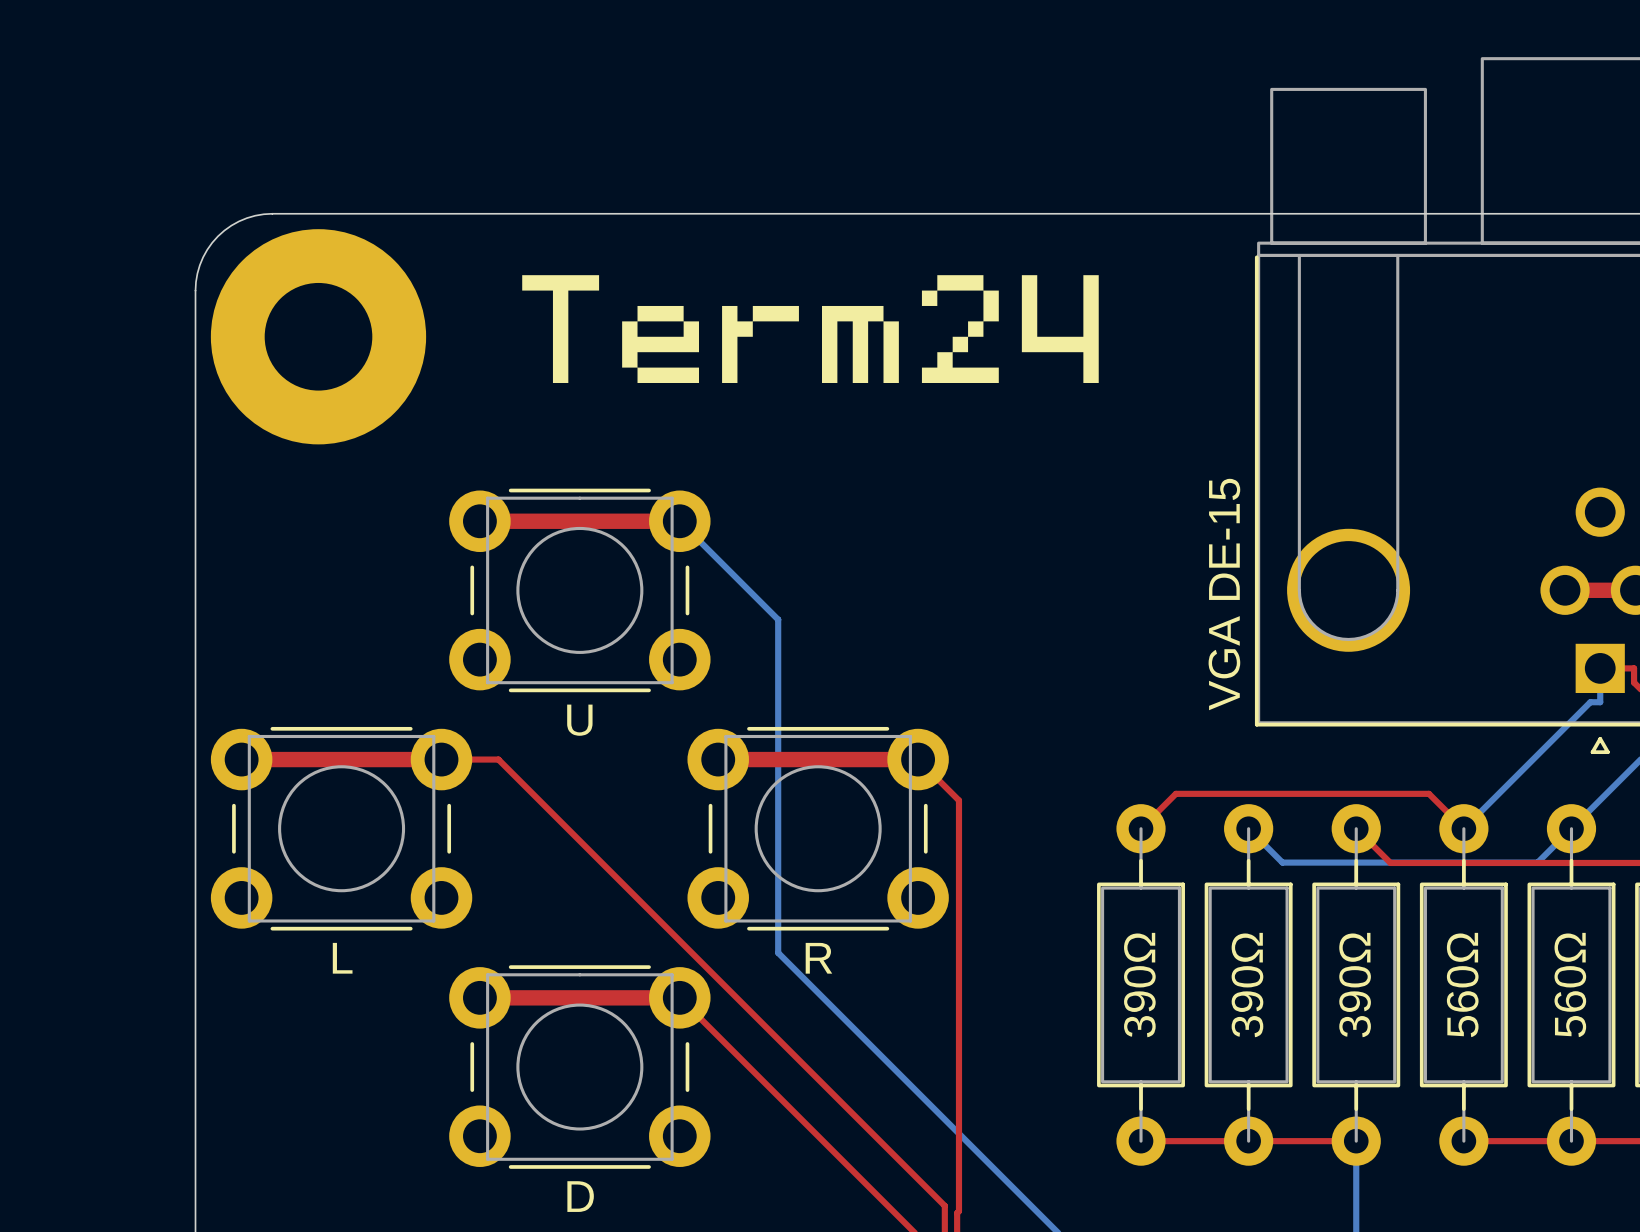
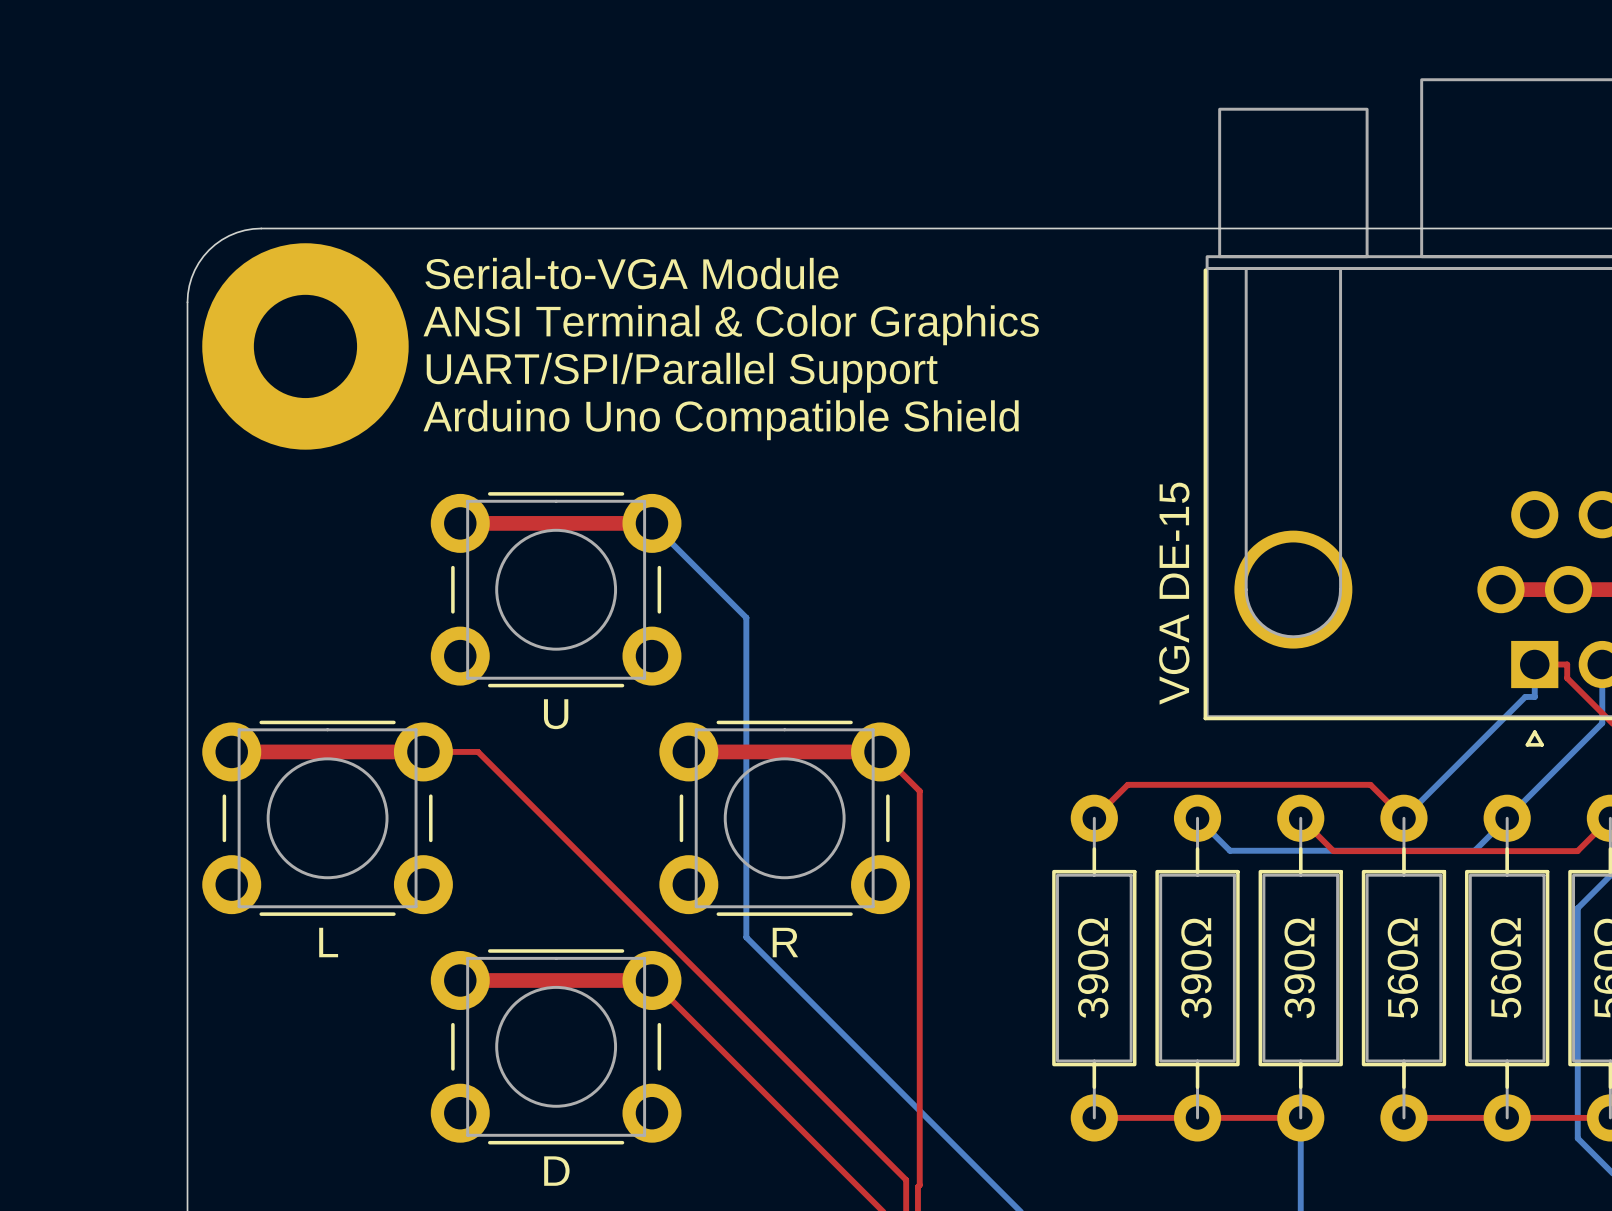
text: none -> Serial-to-VGA Module (631, 273)
drawing: [522, 275, 1099, 384] -> none
text: none -> ANSI Terminal & Color Graphics (731, 325)
text: none -> UART/SPI/Parallel Support (682, 372)
text: none -> Arduino Uno Compatible Shield (721, 420)

